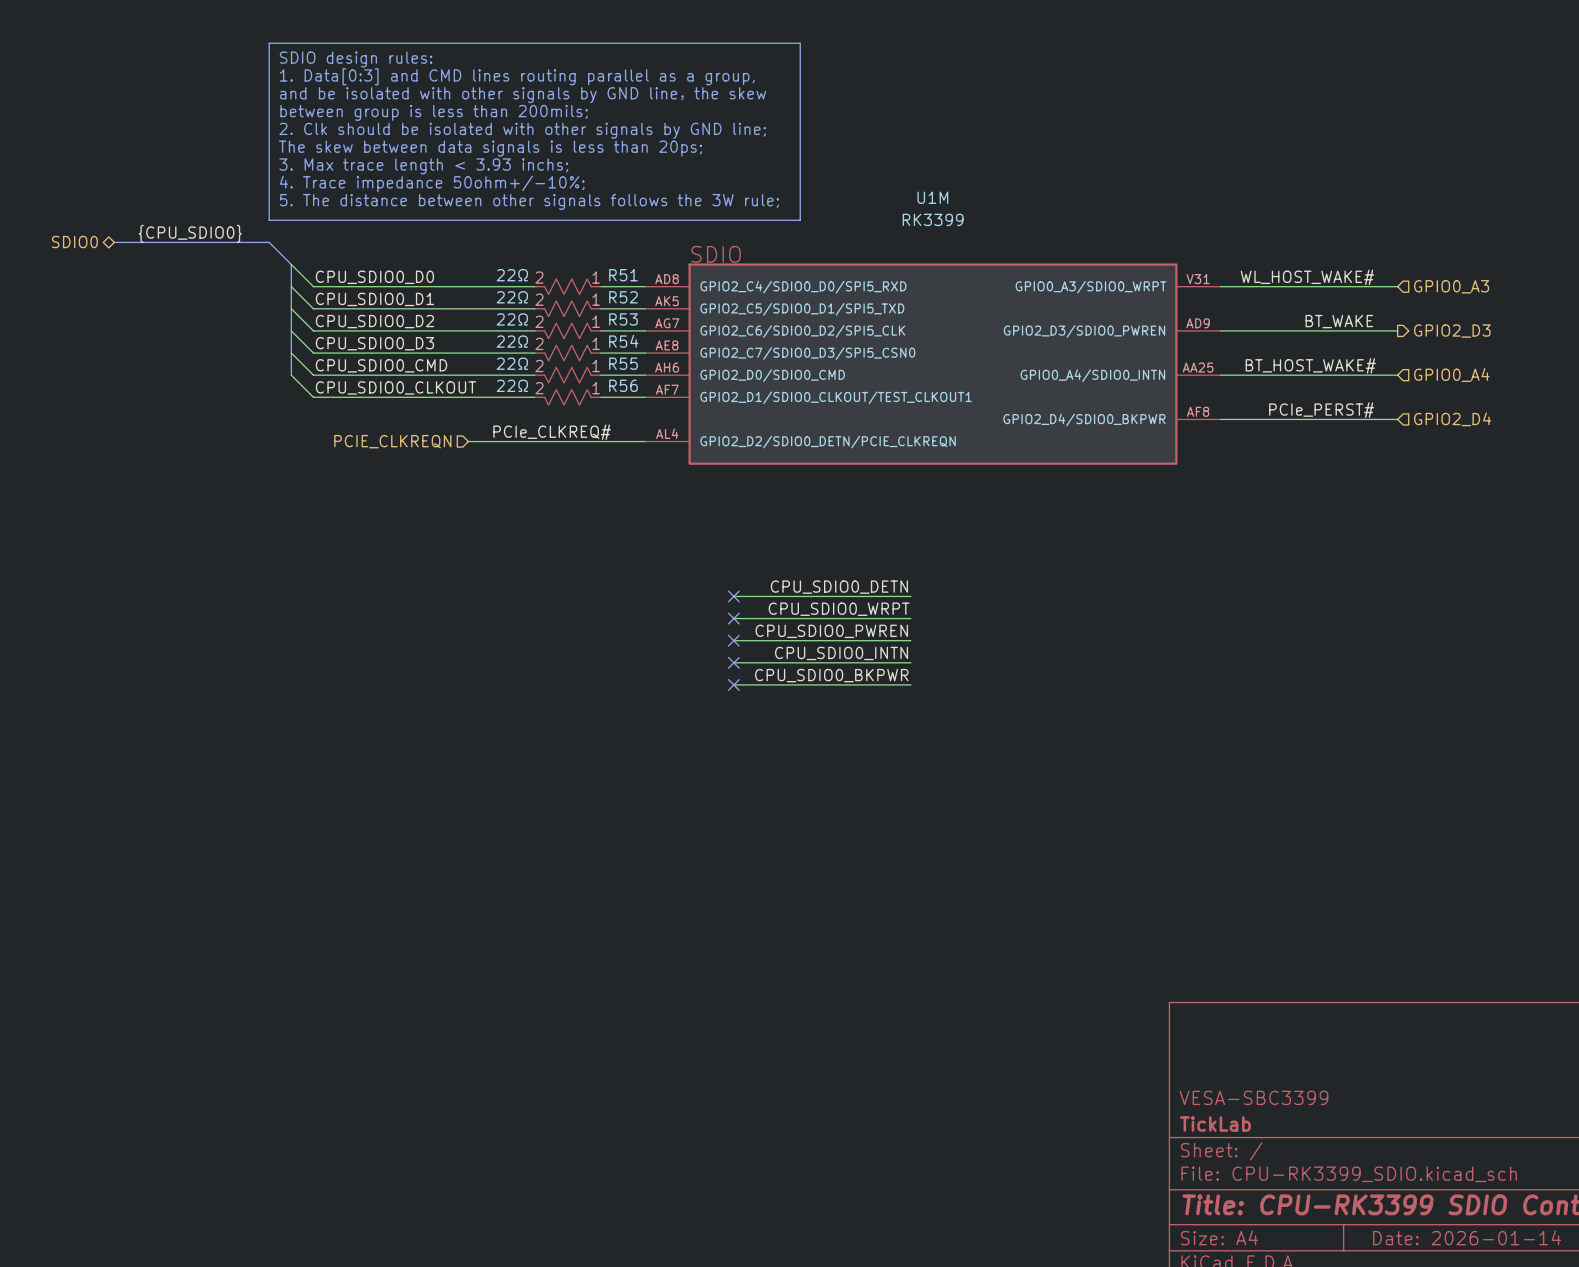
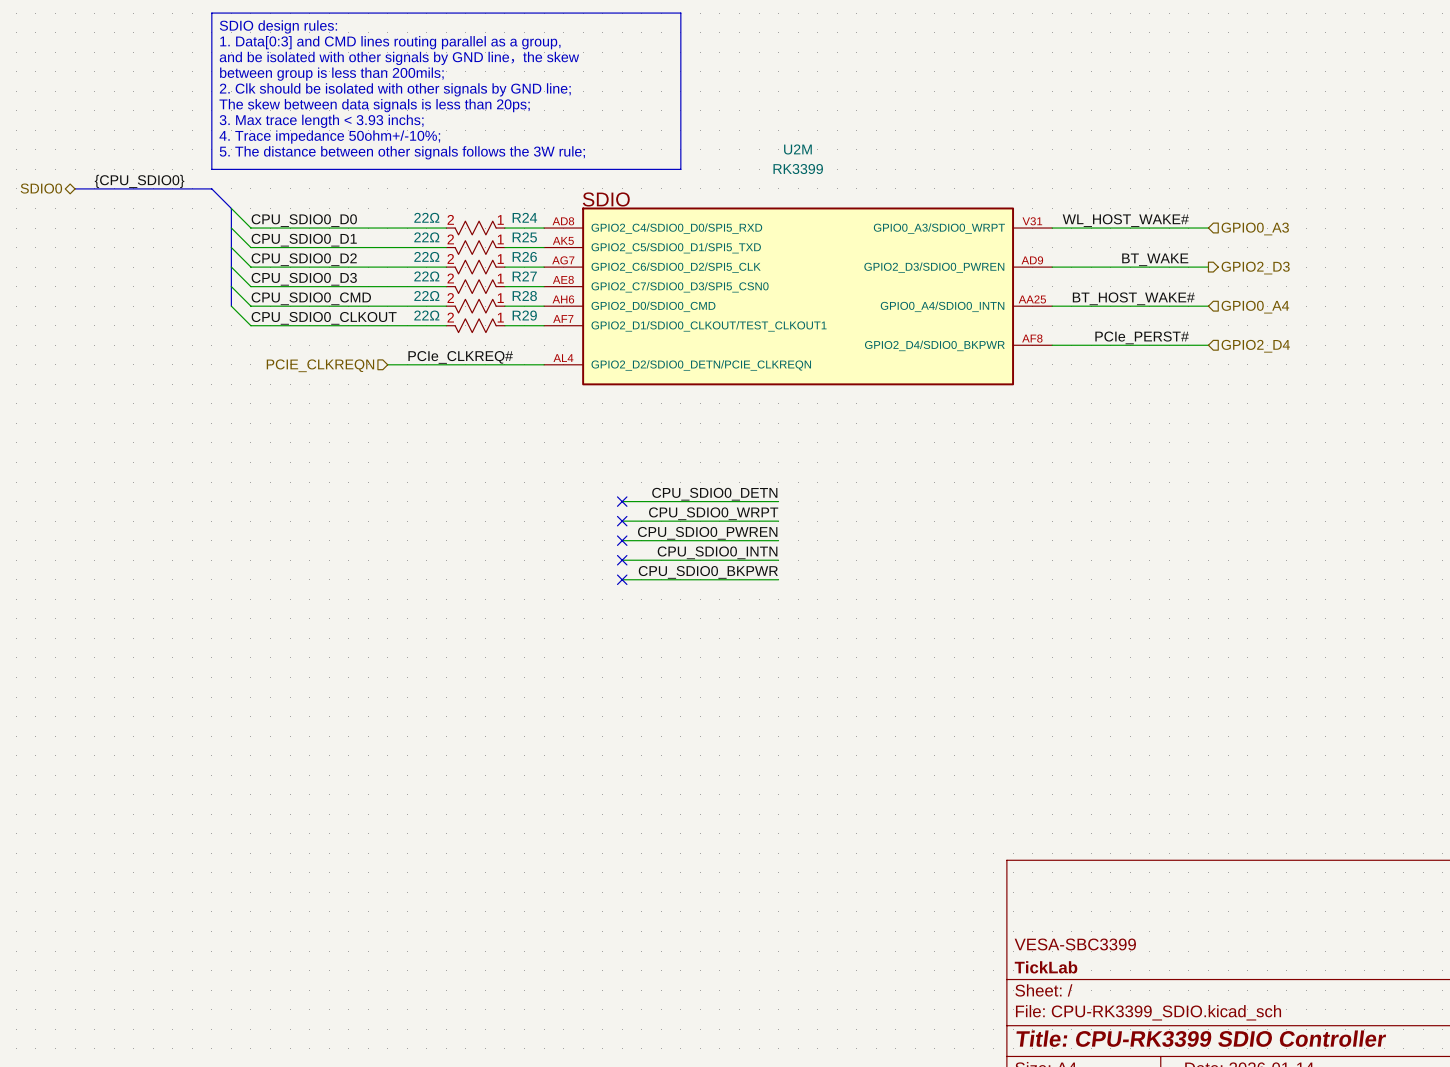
U1M name: U1M (932, 197) -> U2M (797, 149)
R51 name: R51 (623, 275) -> R24 (524, 217)
R52 name: R52 (623, 297) -> R25 (524, 237)
R53 name: R53 (623, 319) -> R26 (524, 256)
R54 name: R54 (623, 341) -> R27 (524, 276)
R55 name: R55 (623, 363) -> R28 (524, 296)
R56 name: R56 (623, 385) -> R29 (524, 315)

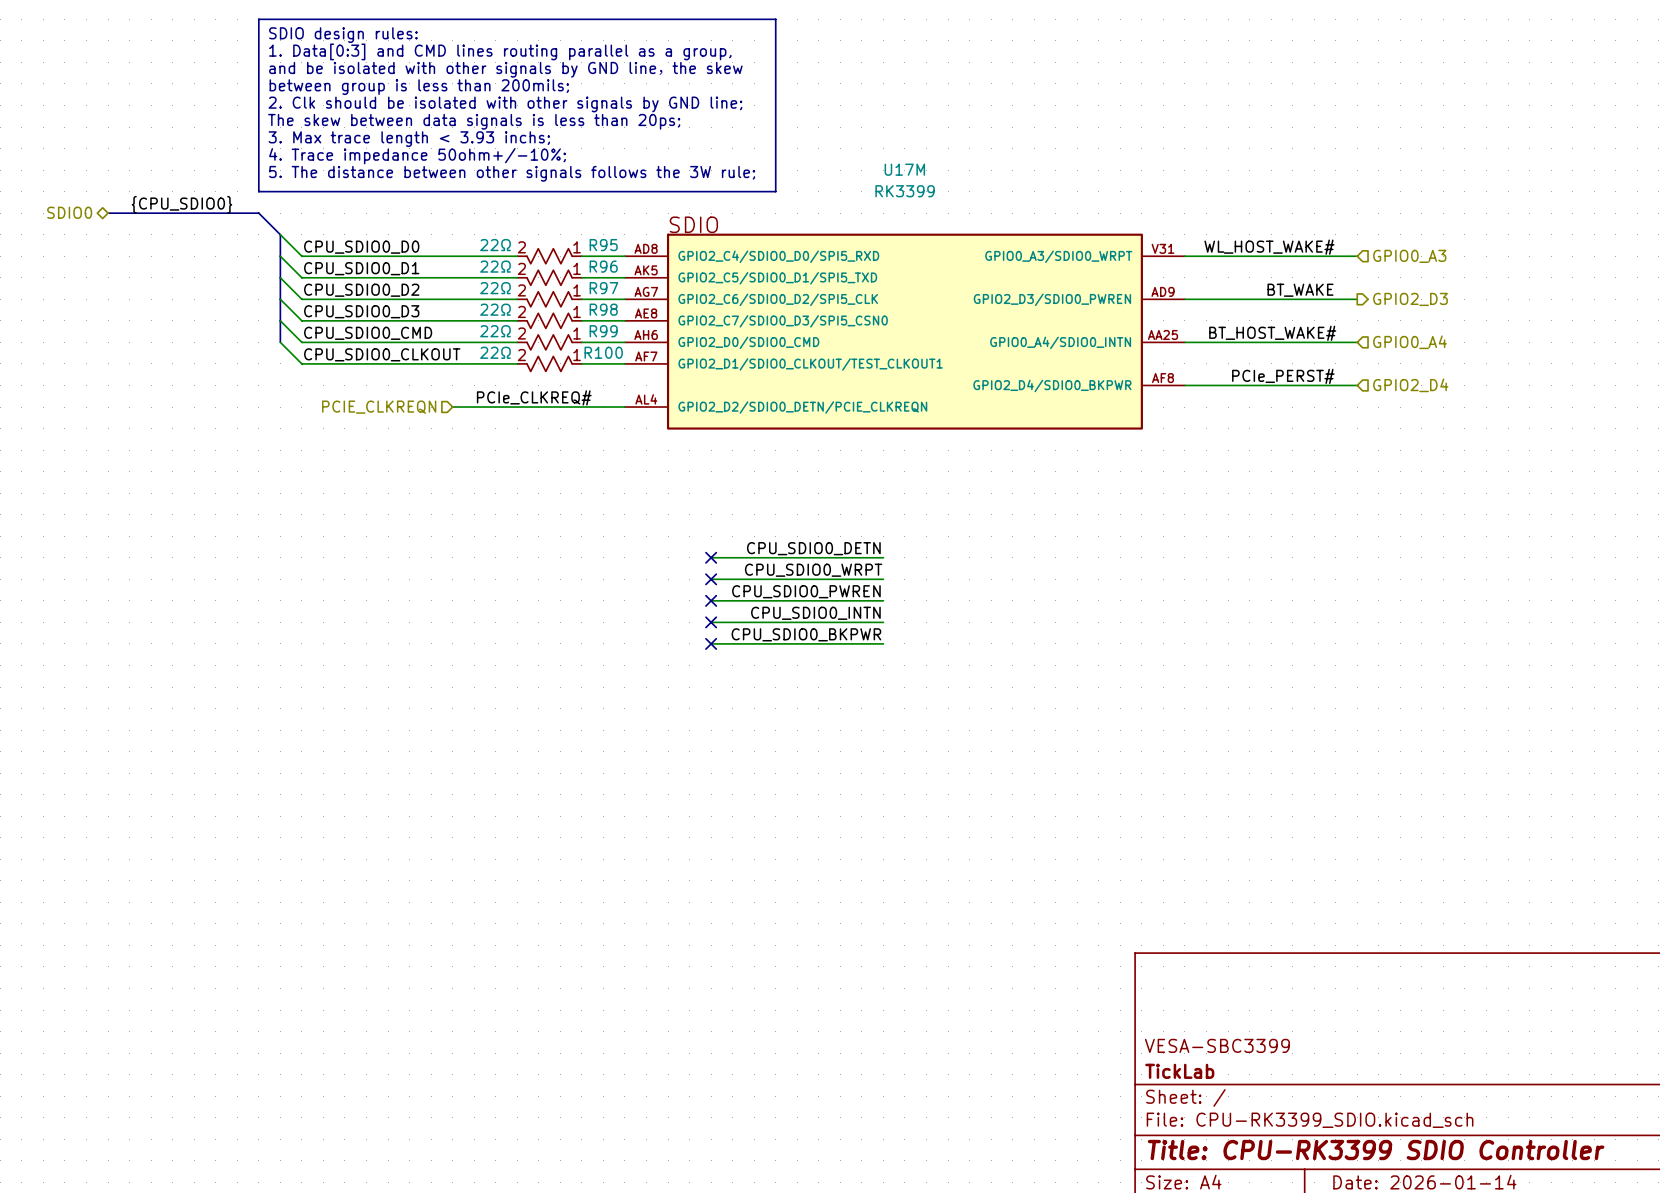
U2M name: U2M (797, 149) -> U17M (904, 169)
R24 name: R24 (524, 217) -> R95 (603, 245)
R25 name: R25 (524, 237) -> R96 (603, 266)
R26 name: R26 (524, 256) -> R97 (603, 288)
R27 name: R27 (524, 276) -> R98 (603, 309)
R28 name: R28 (524, 296) -> R99 (603, 331)
R29 name: R29 (524, 315) -> R100 (603, 352)

